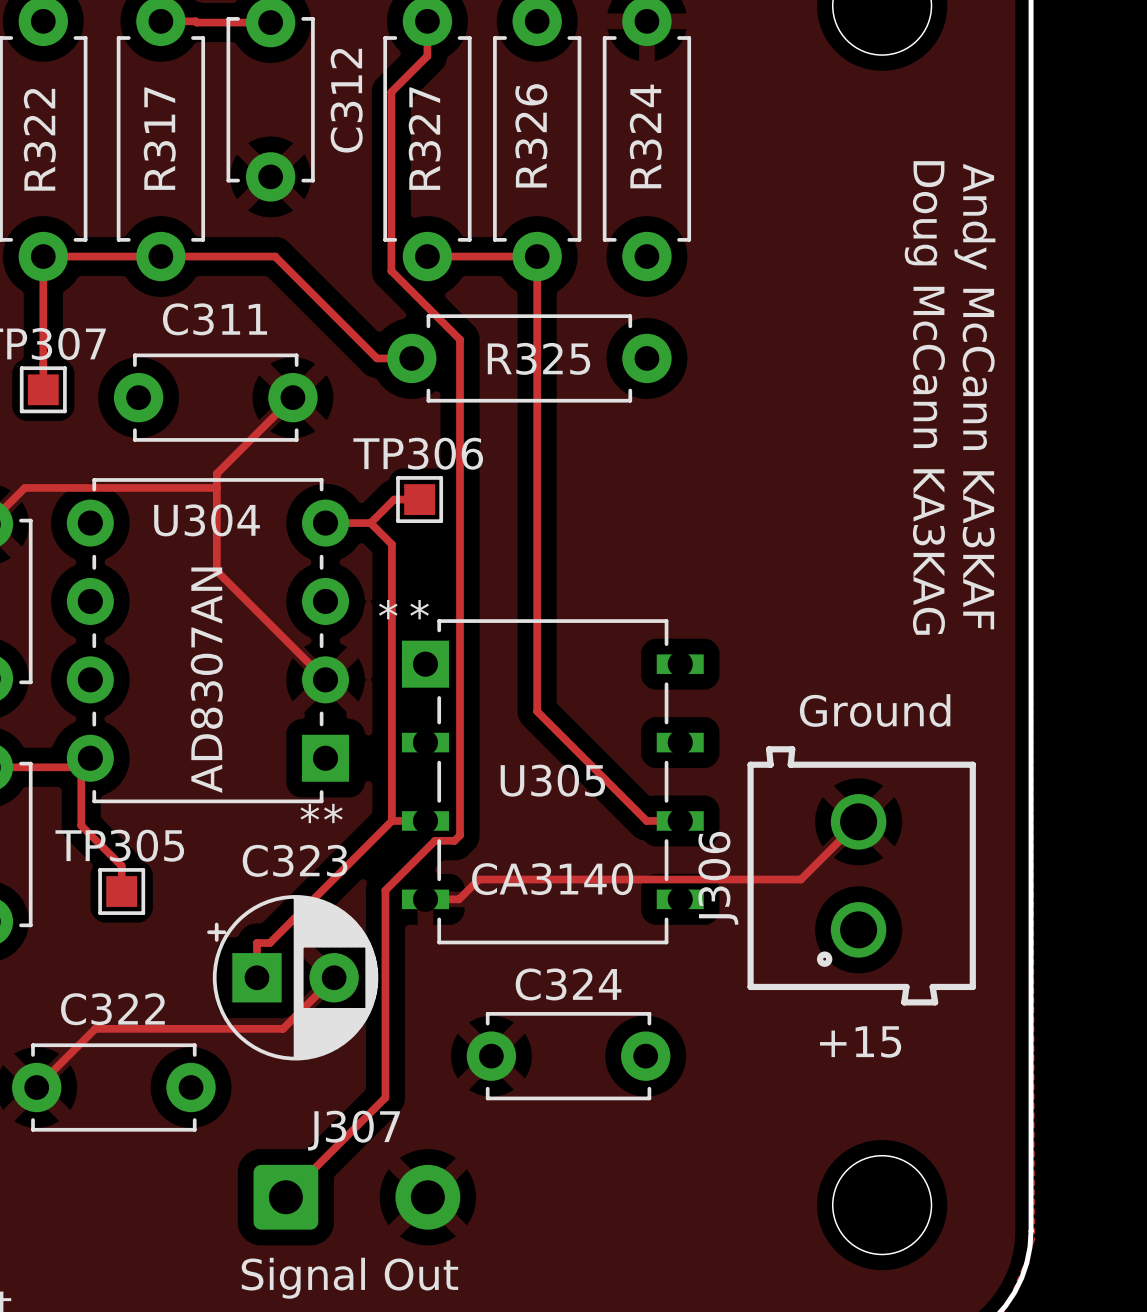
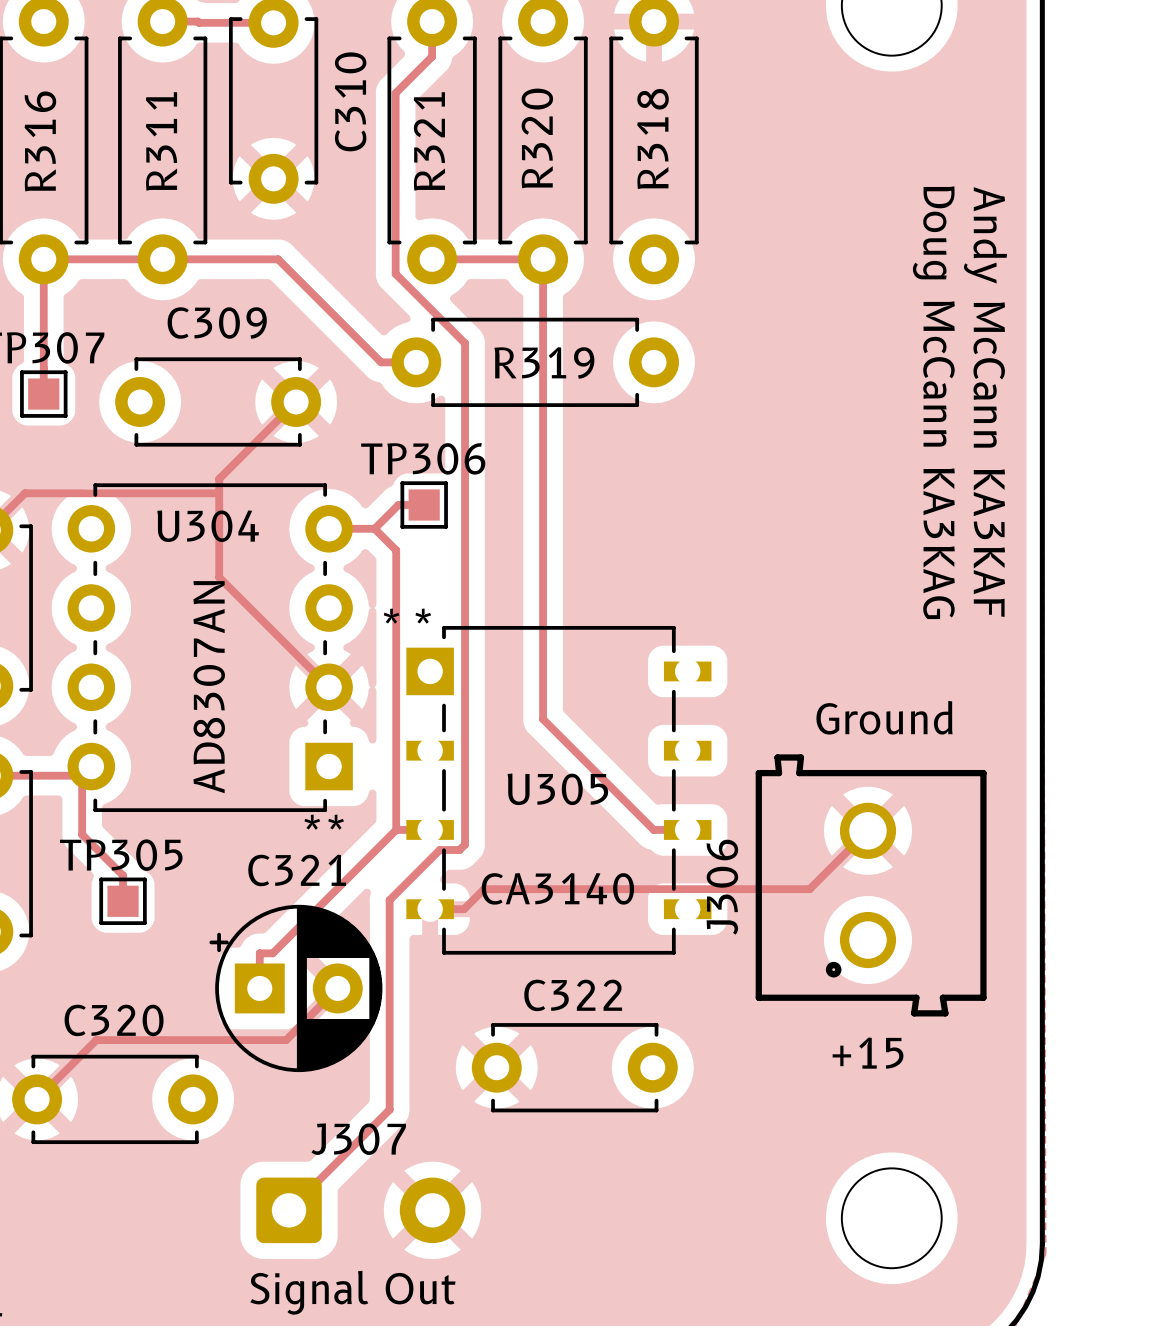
C312 name: C312 (346, 100) -> C310 (350, 101)
R326 name: R326 (531, 135) -> R320 (537, 138)
R324 name: R324 (645, 136) -> R318 (653, 139)
R317 name: R317 (159, 138) -> R311 (161, 141)
R327 name: R327 (424, 138) -> R321 (429, 141)
R322 name: R322 (39, 139) -> R316 (40, 141)
C311 name: C311 (215, 319) -> C309 (217, 323)
R325 name: R325 (538, 358) -> R319 (544, 362)
C323 name: C323 (295, 860) -> C321 (297, 870)
C324 name: C324 (568, 984) -> C322 (573, 995)
C322 name: C322 (112, 1009) -> C320 (114, 1020)

